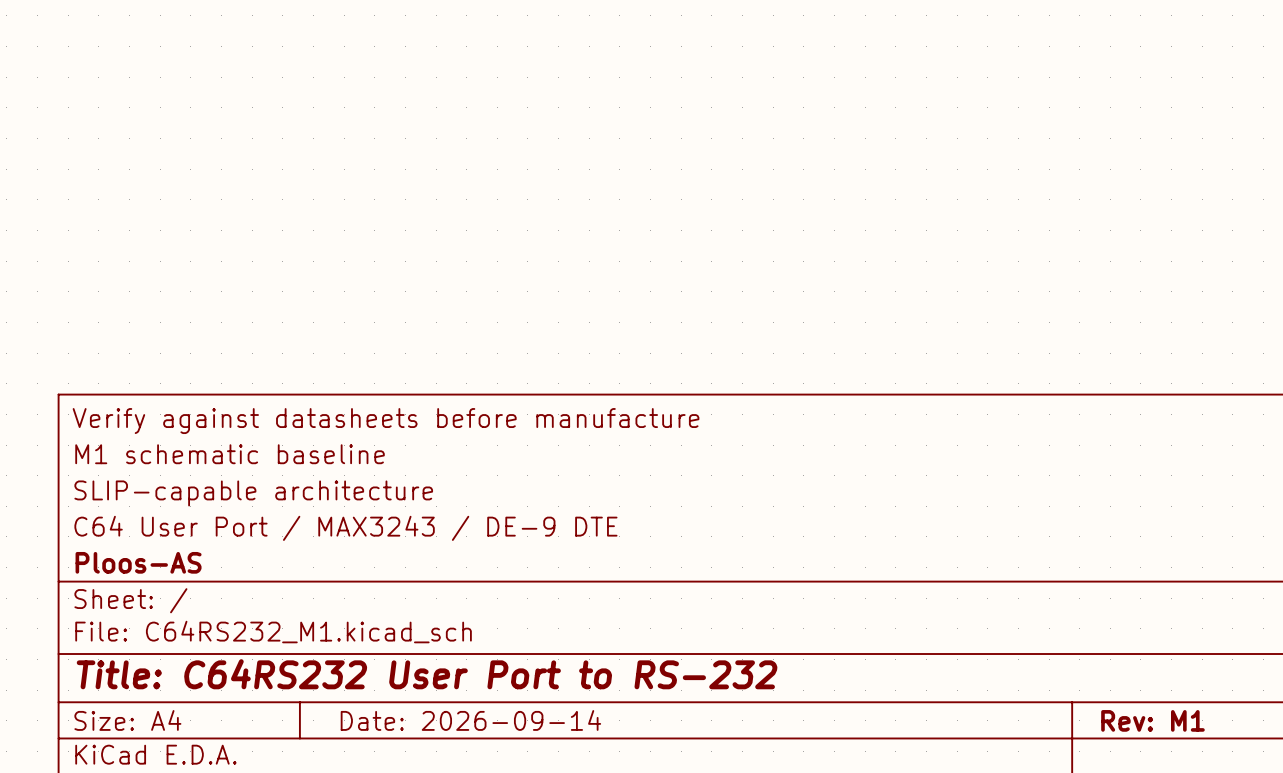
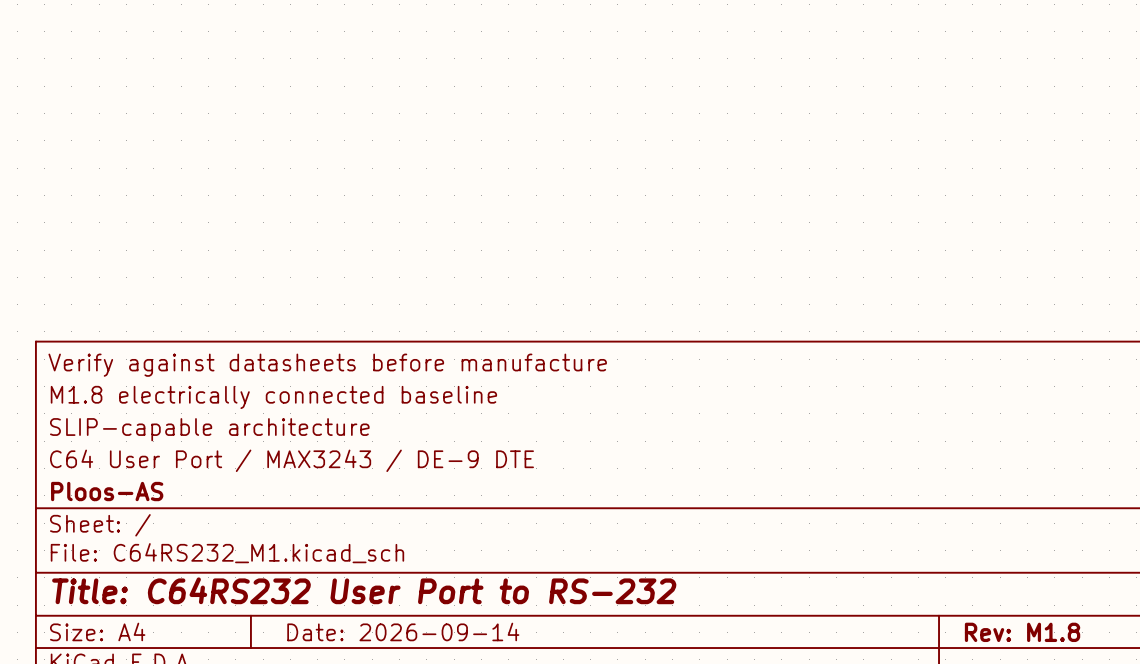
title block: M1 schematic baseline (230, 454) -> M1.8 electrically connected baseline (273, 397)
title block: Rev: M1 (1152, 720) -> Rev: M1.8 (1022, 632)

